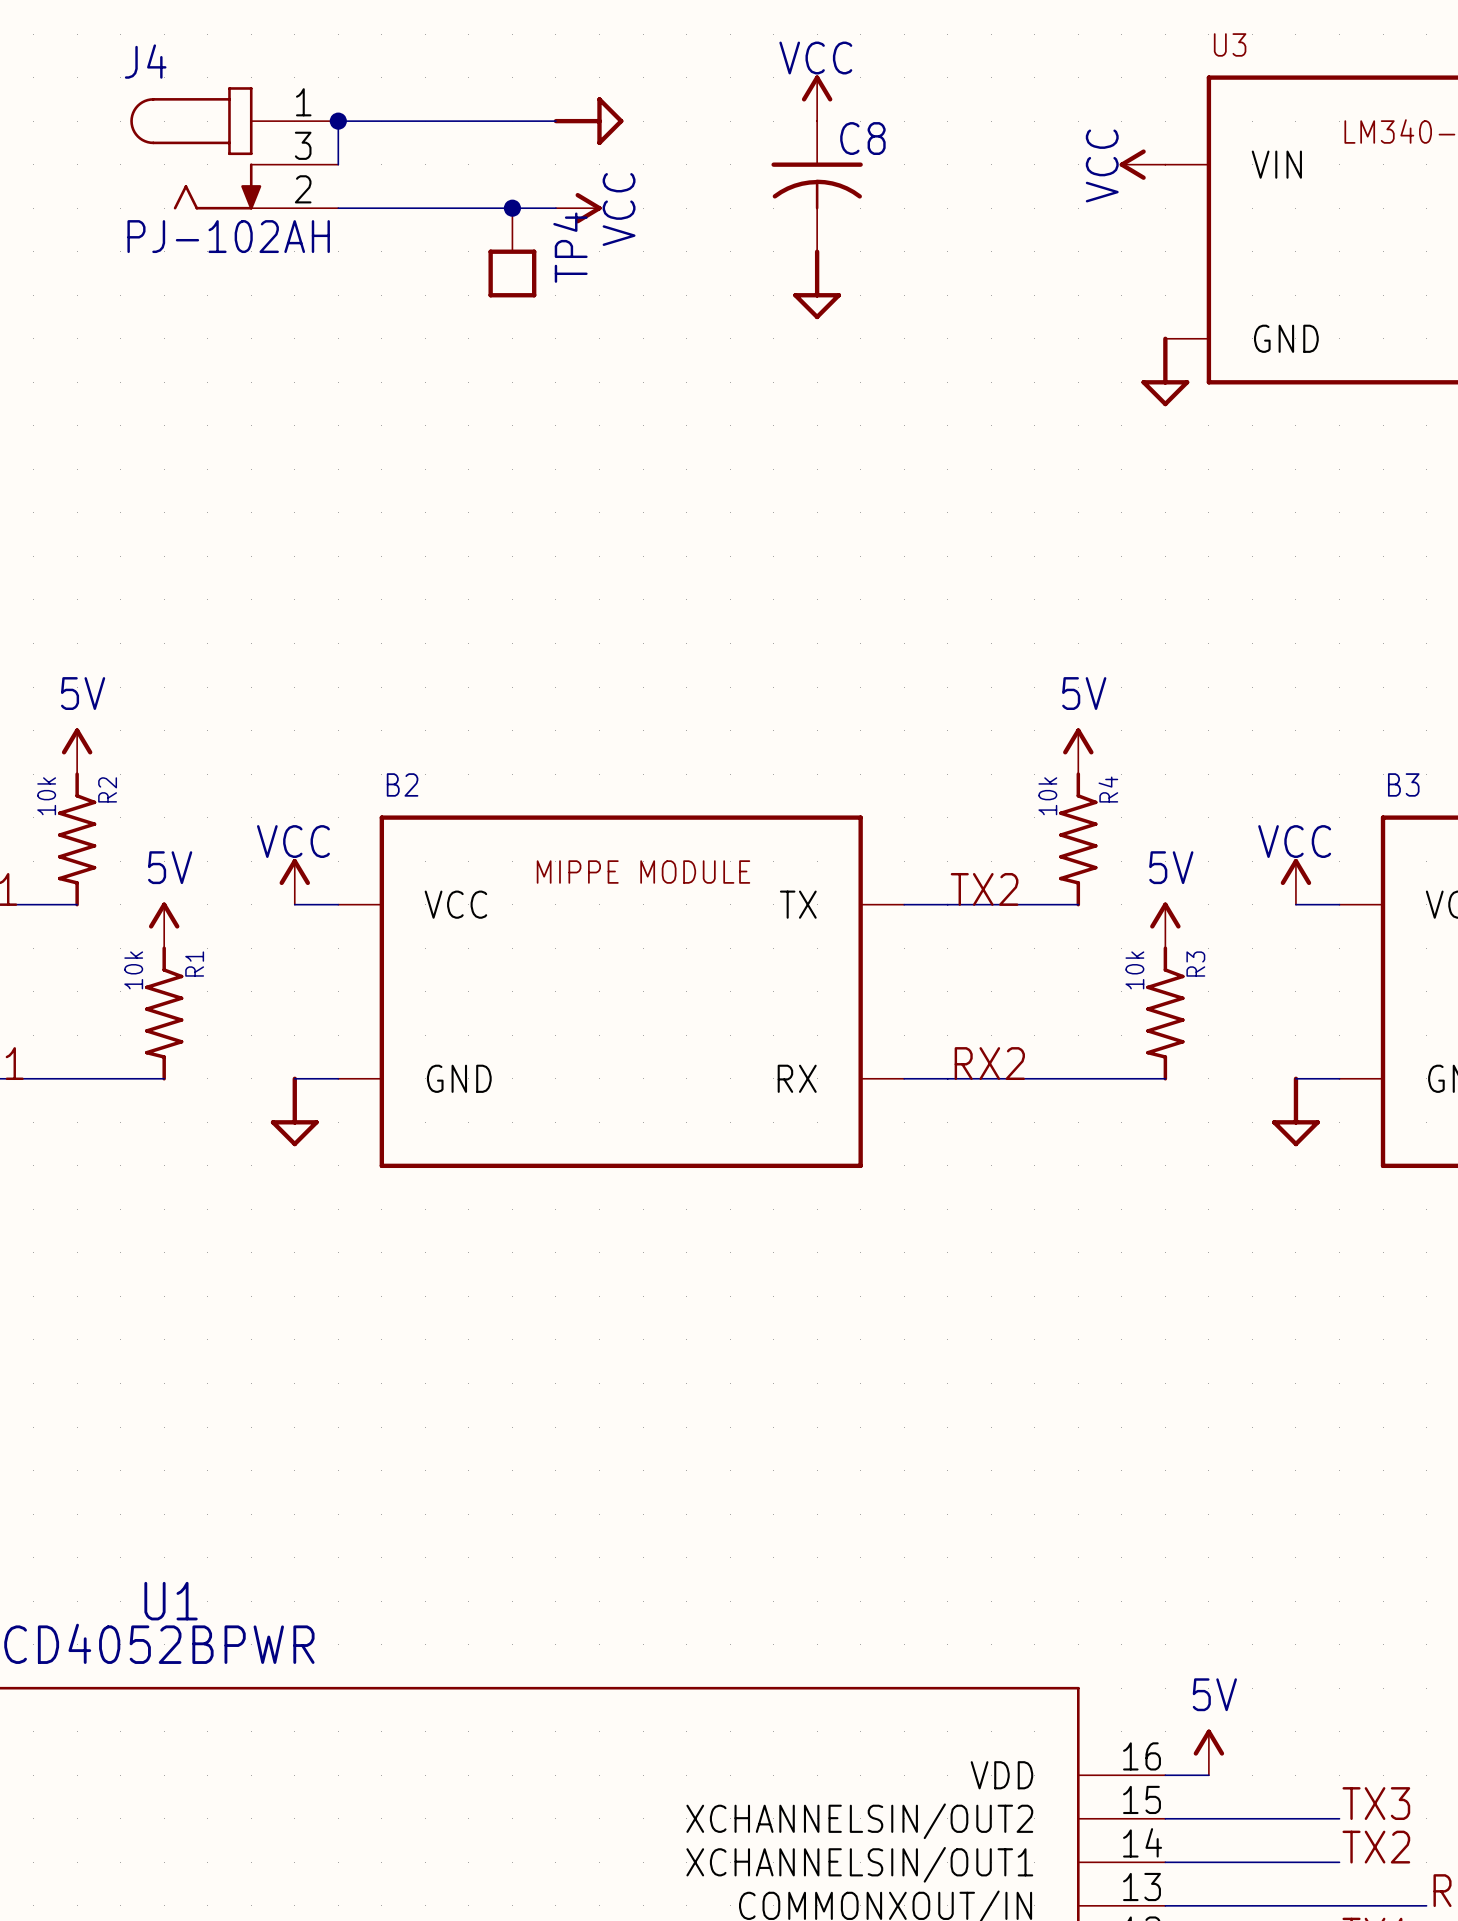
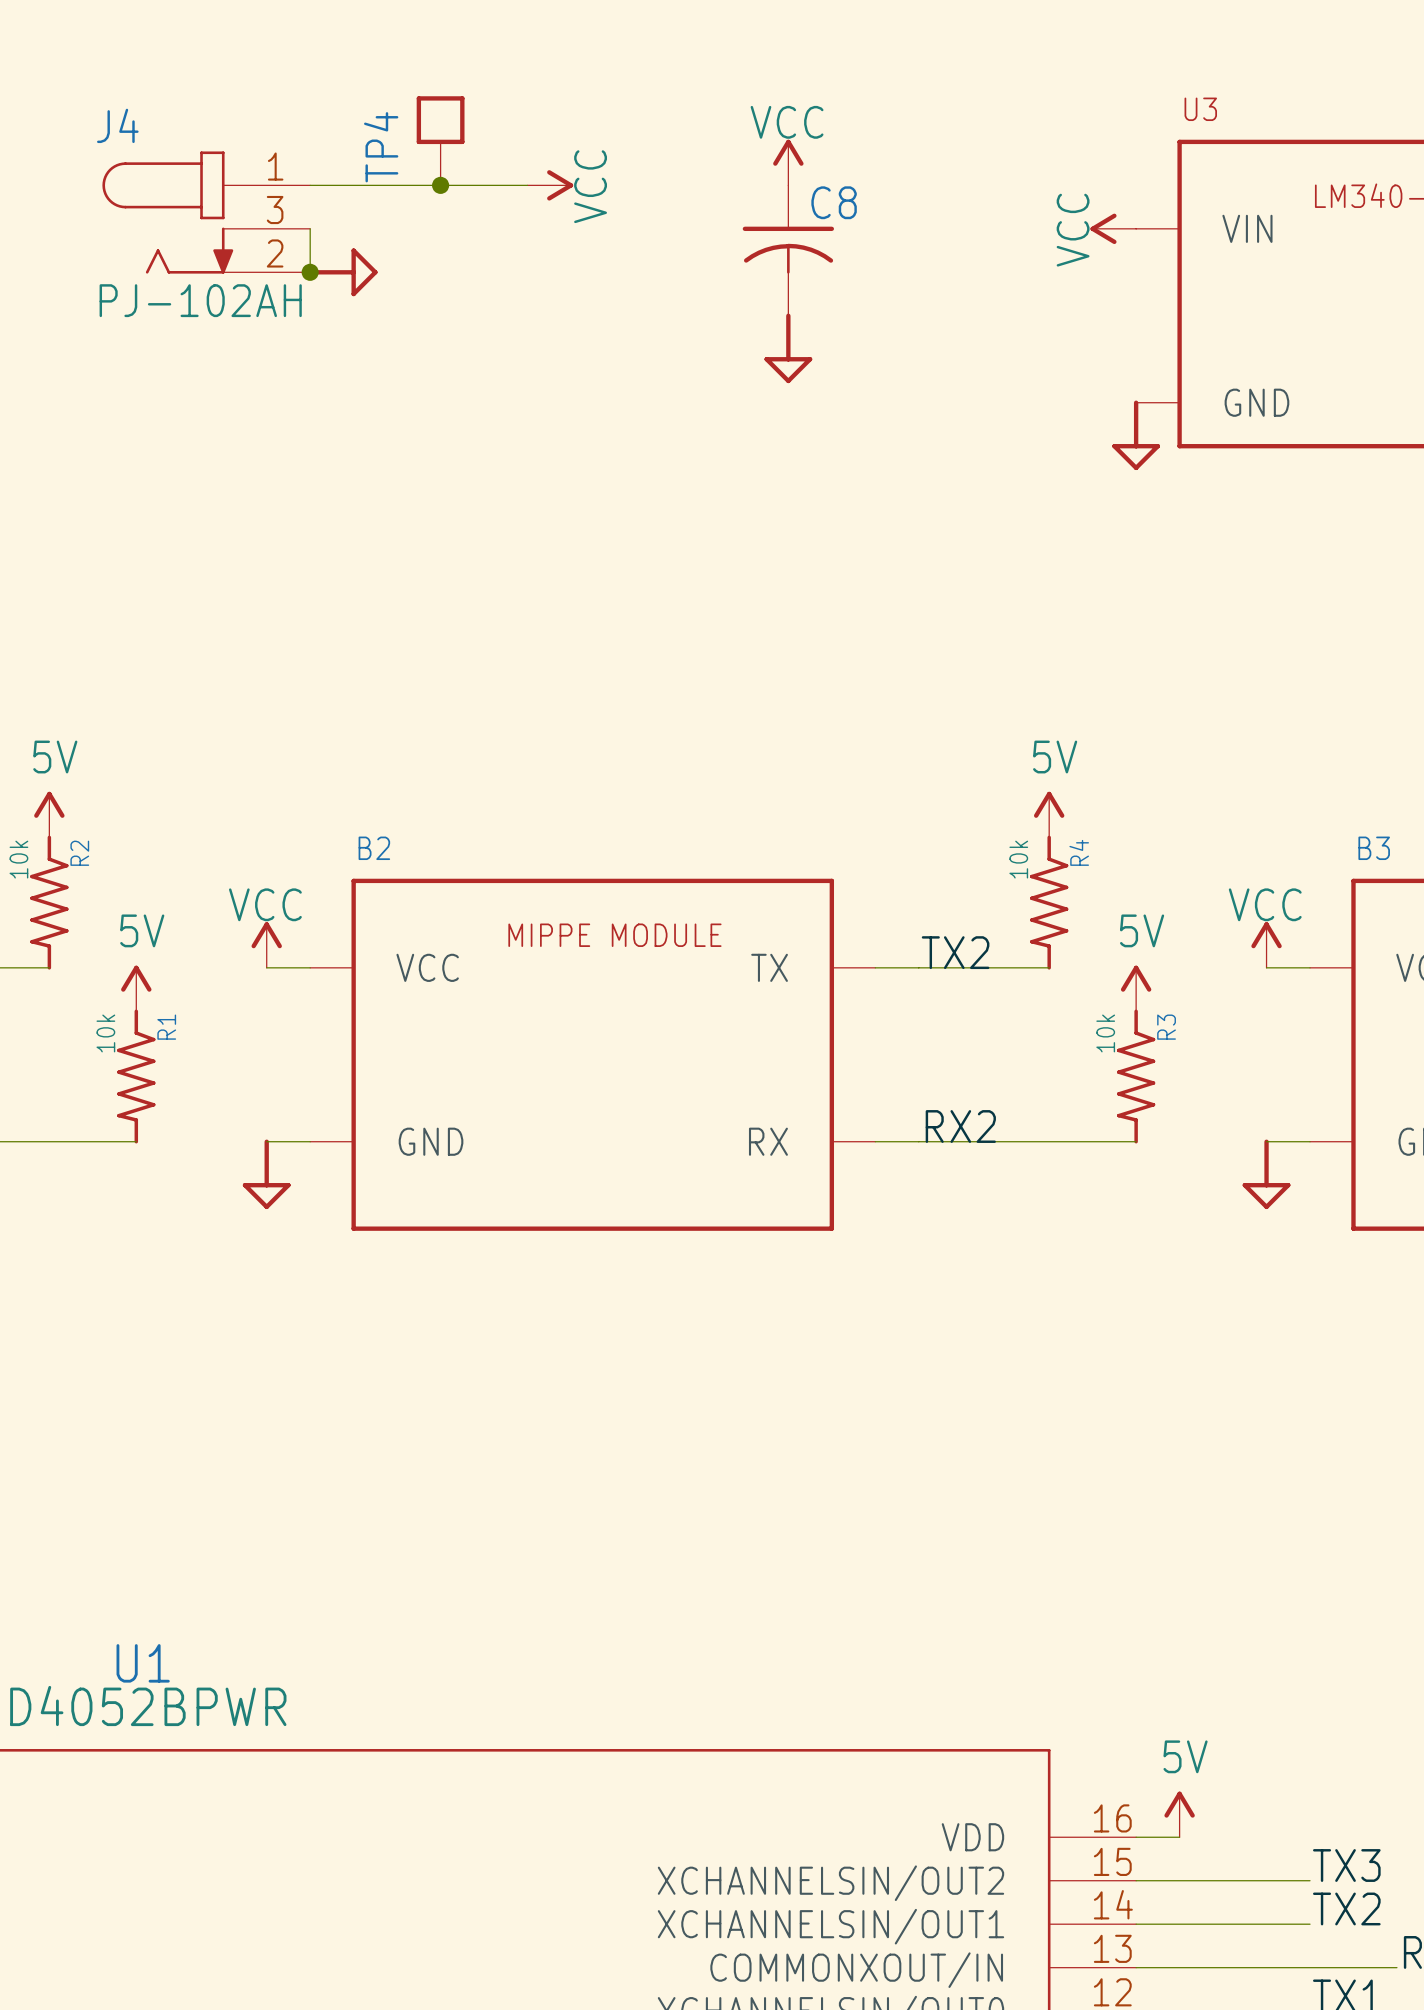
power symbol shape: [553, 97, 624, 146] -> [527, 170, 574, 201]
wire: (338, 121) (338, 164) -> (310, 272) (310, 228)
junction: (338, 121) -> none
junction: none -> (440, 185)
power symbol text: none -> VCC (590, 186)
wire: (338, 208) (555, 208) -> none
junction: none -> (310, 272)
power symbol: none -> (342, 272)
junction: (512, 208) -> none
power symbol: VCC (578, 208) -> none
TP4 position: (512, 252) -> (440, 140)
TP4 rotation: 0° (512, 273) -> 180° (440, 120)

